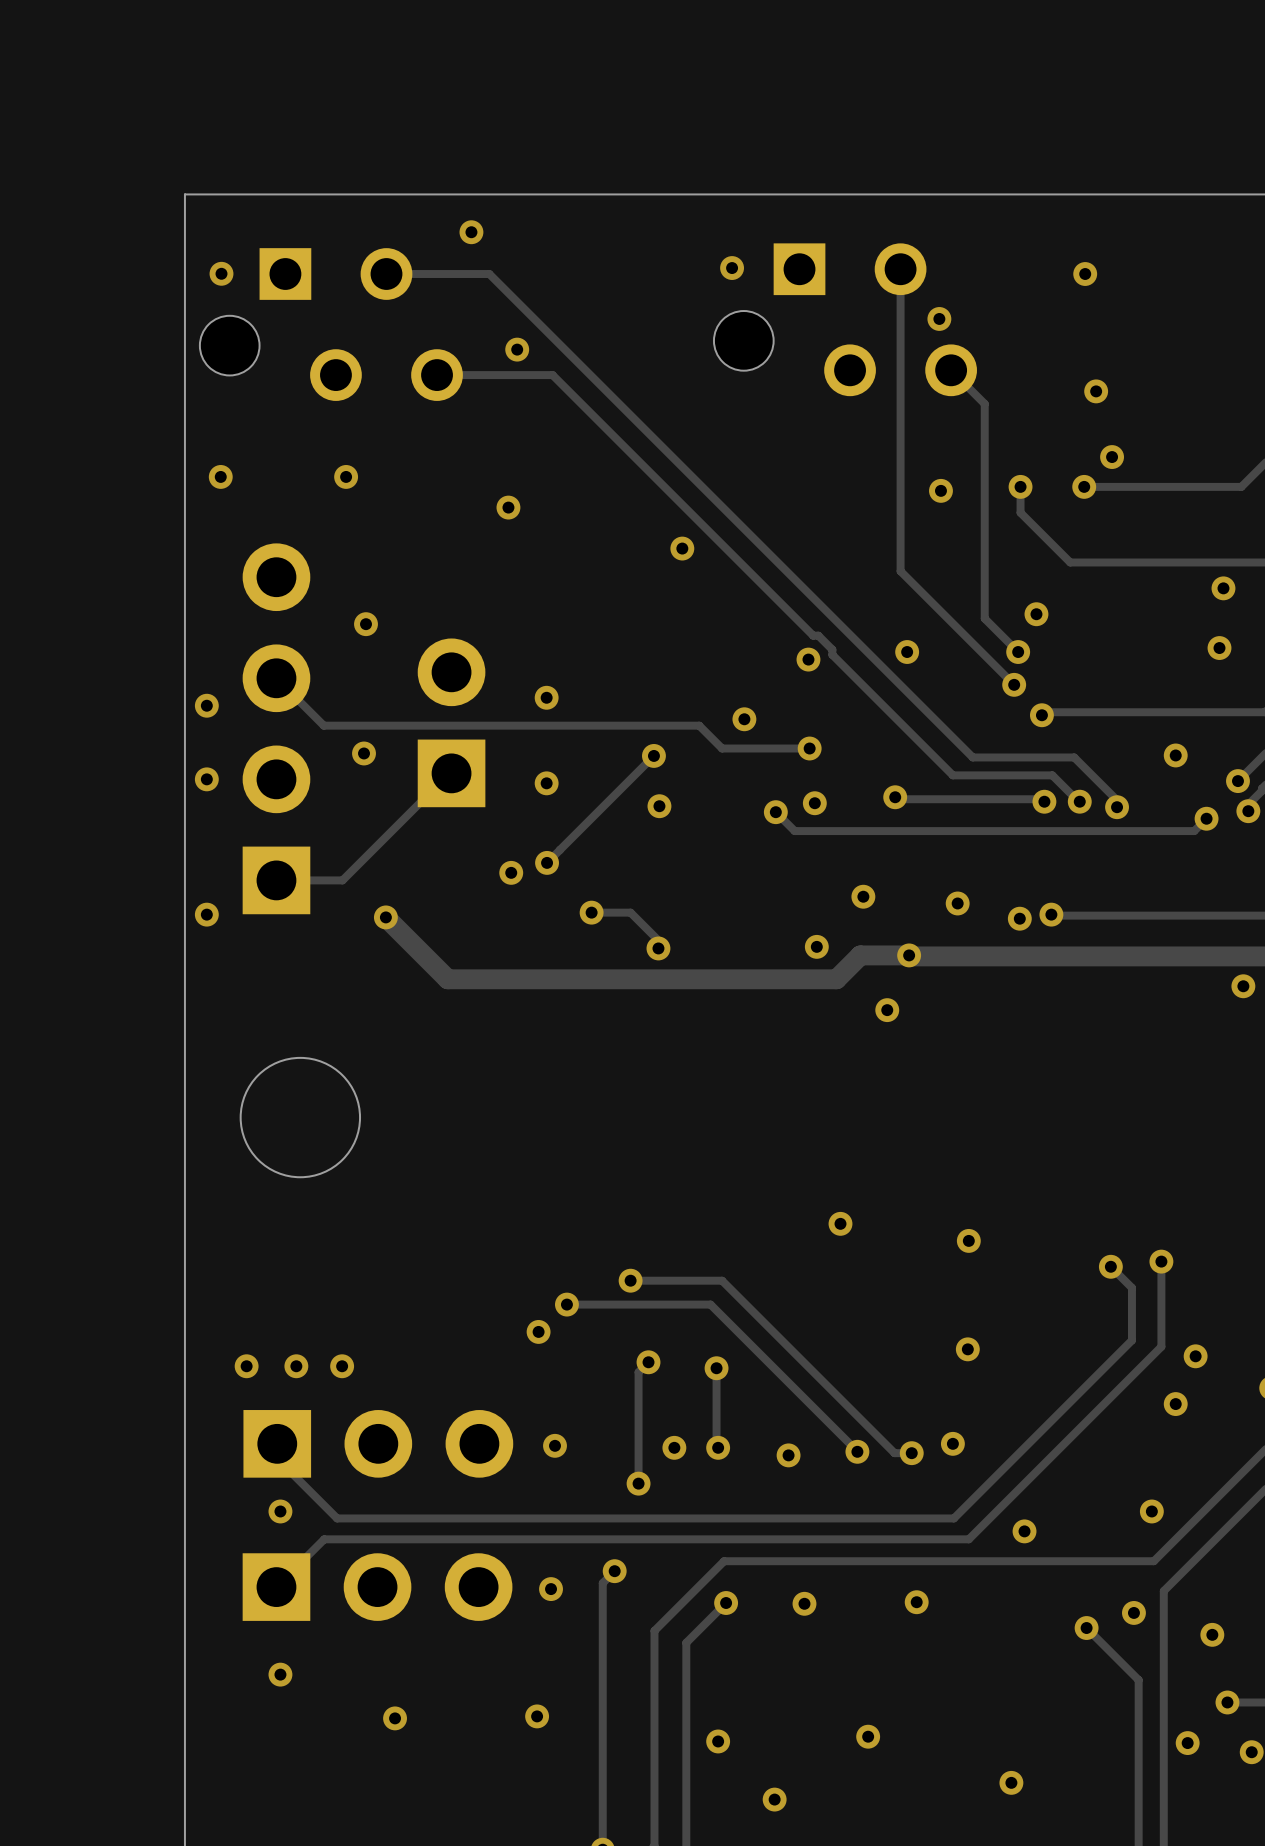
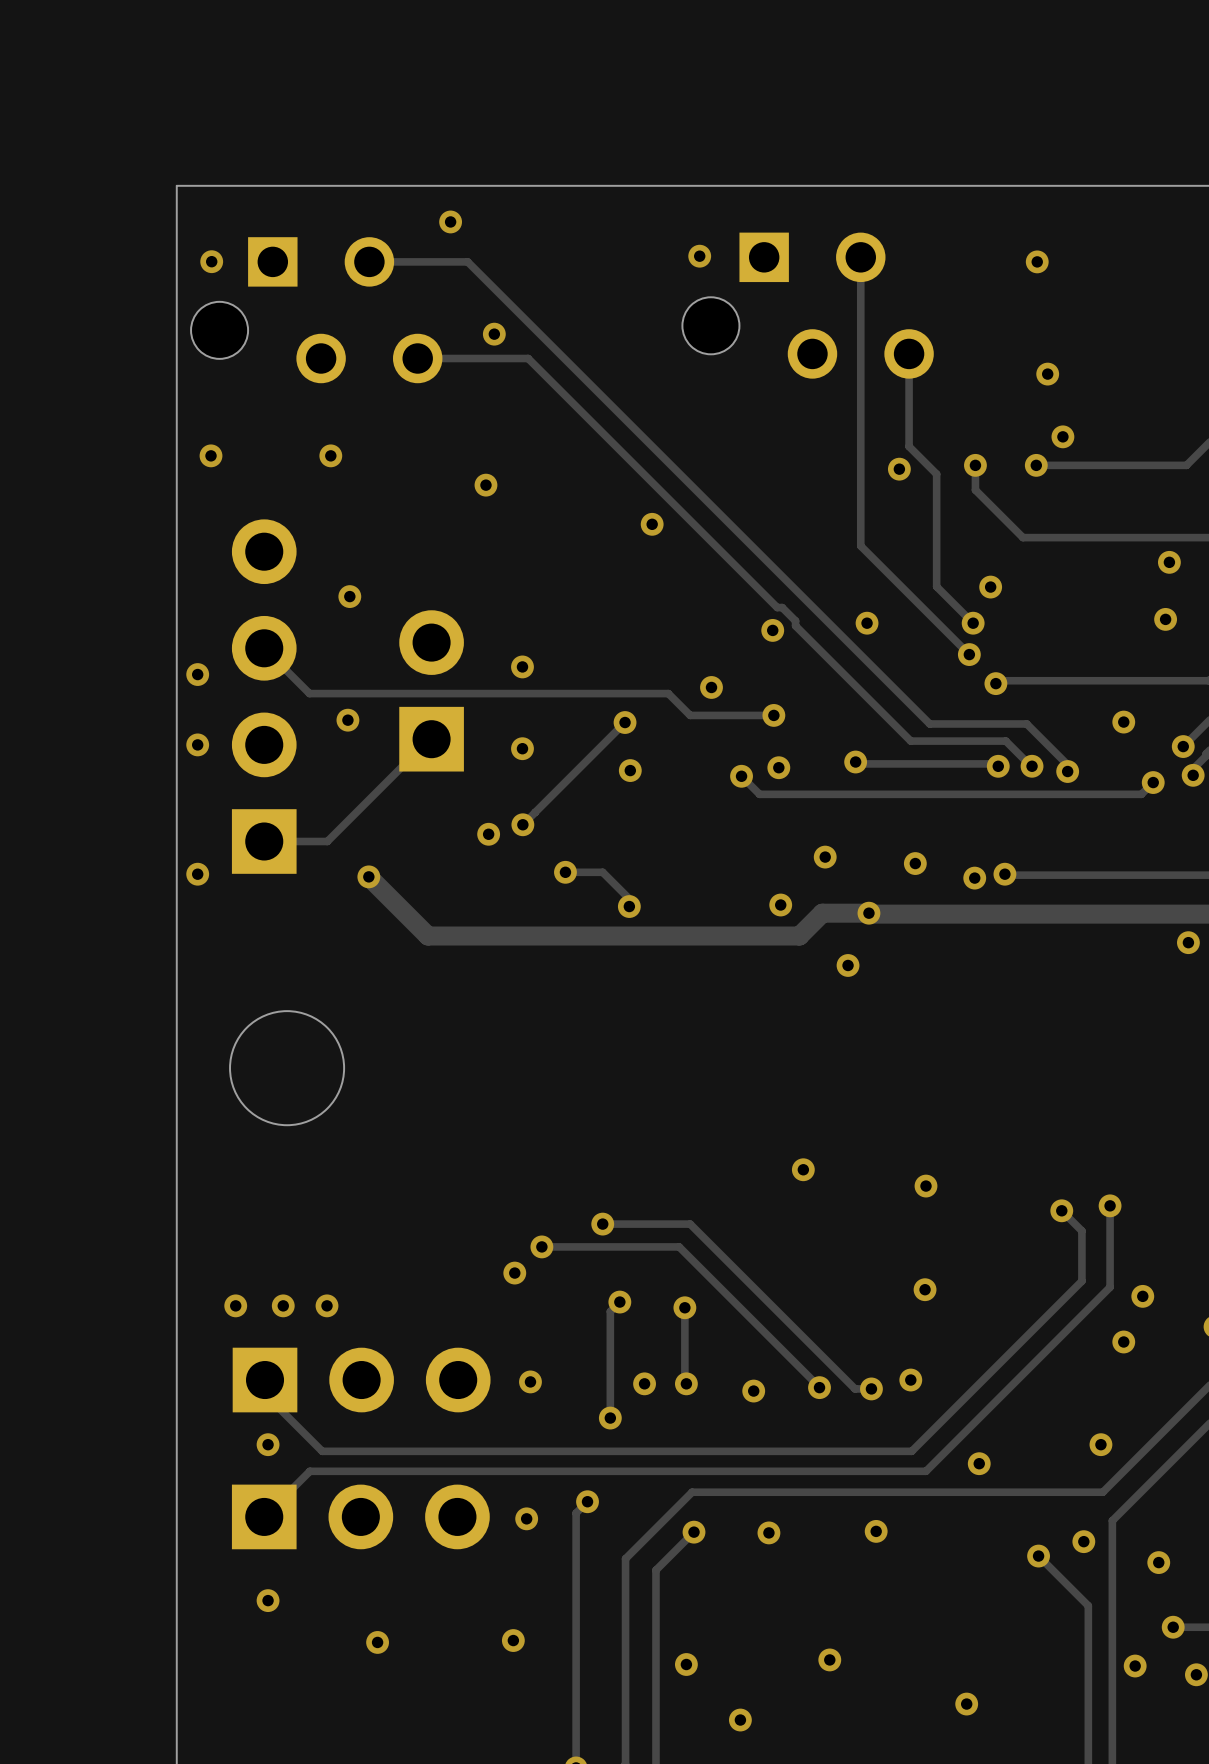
via: (939, 318) -> none
track: (951, 370) (984, 403) (984, 618) -> (909, 353) (909, 446) (936, 474) (936, 586) (941, 591)

